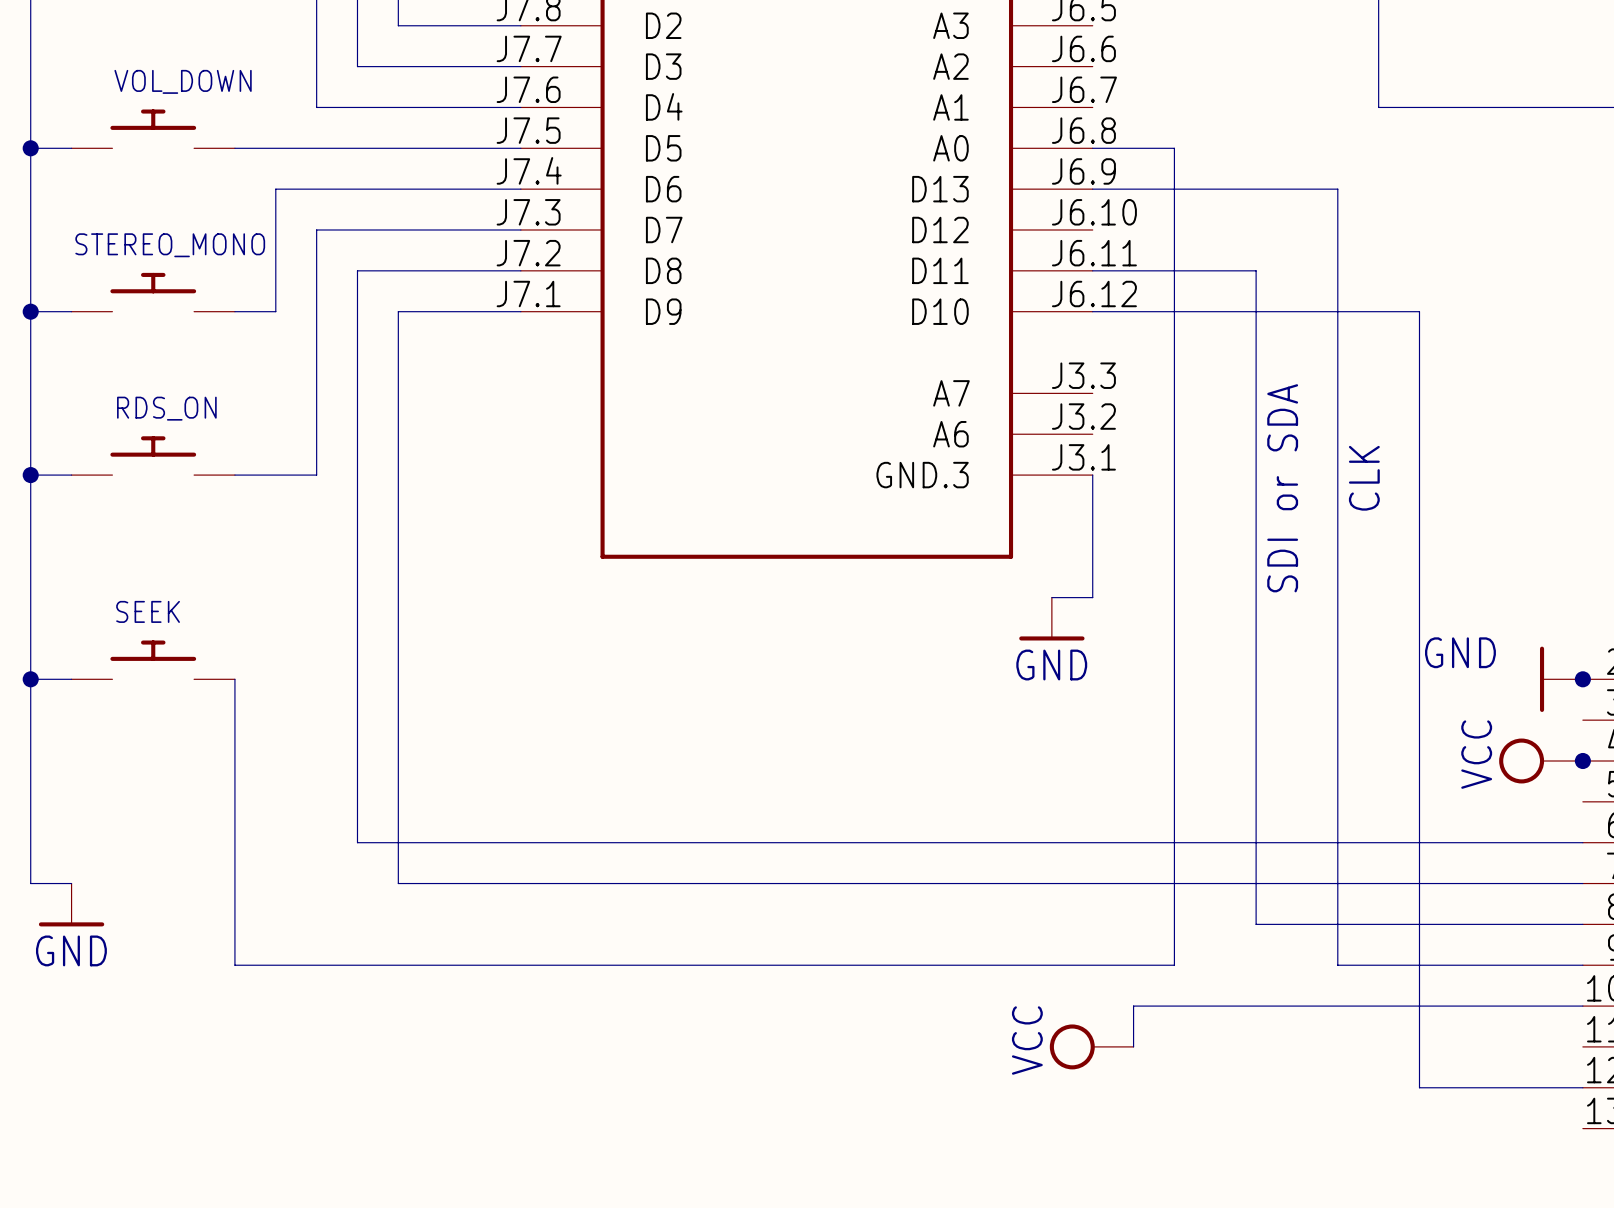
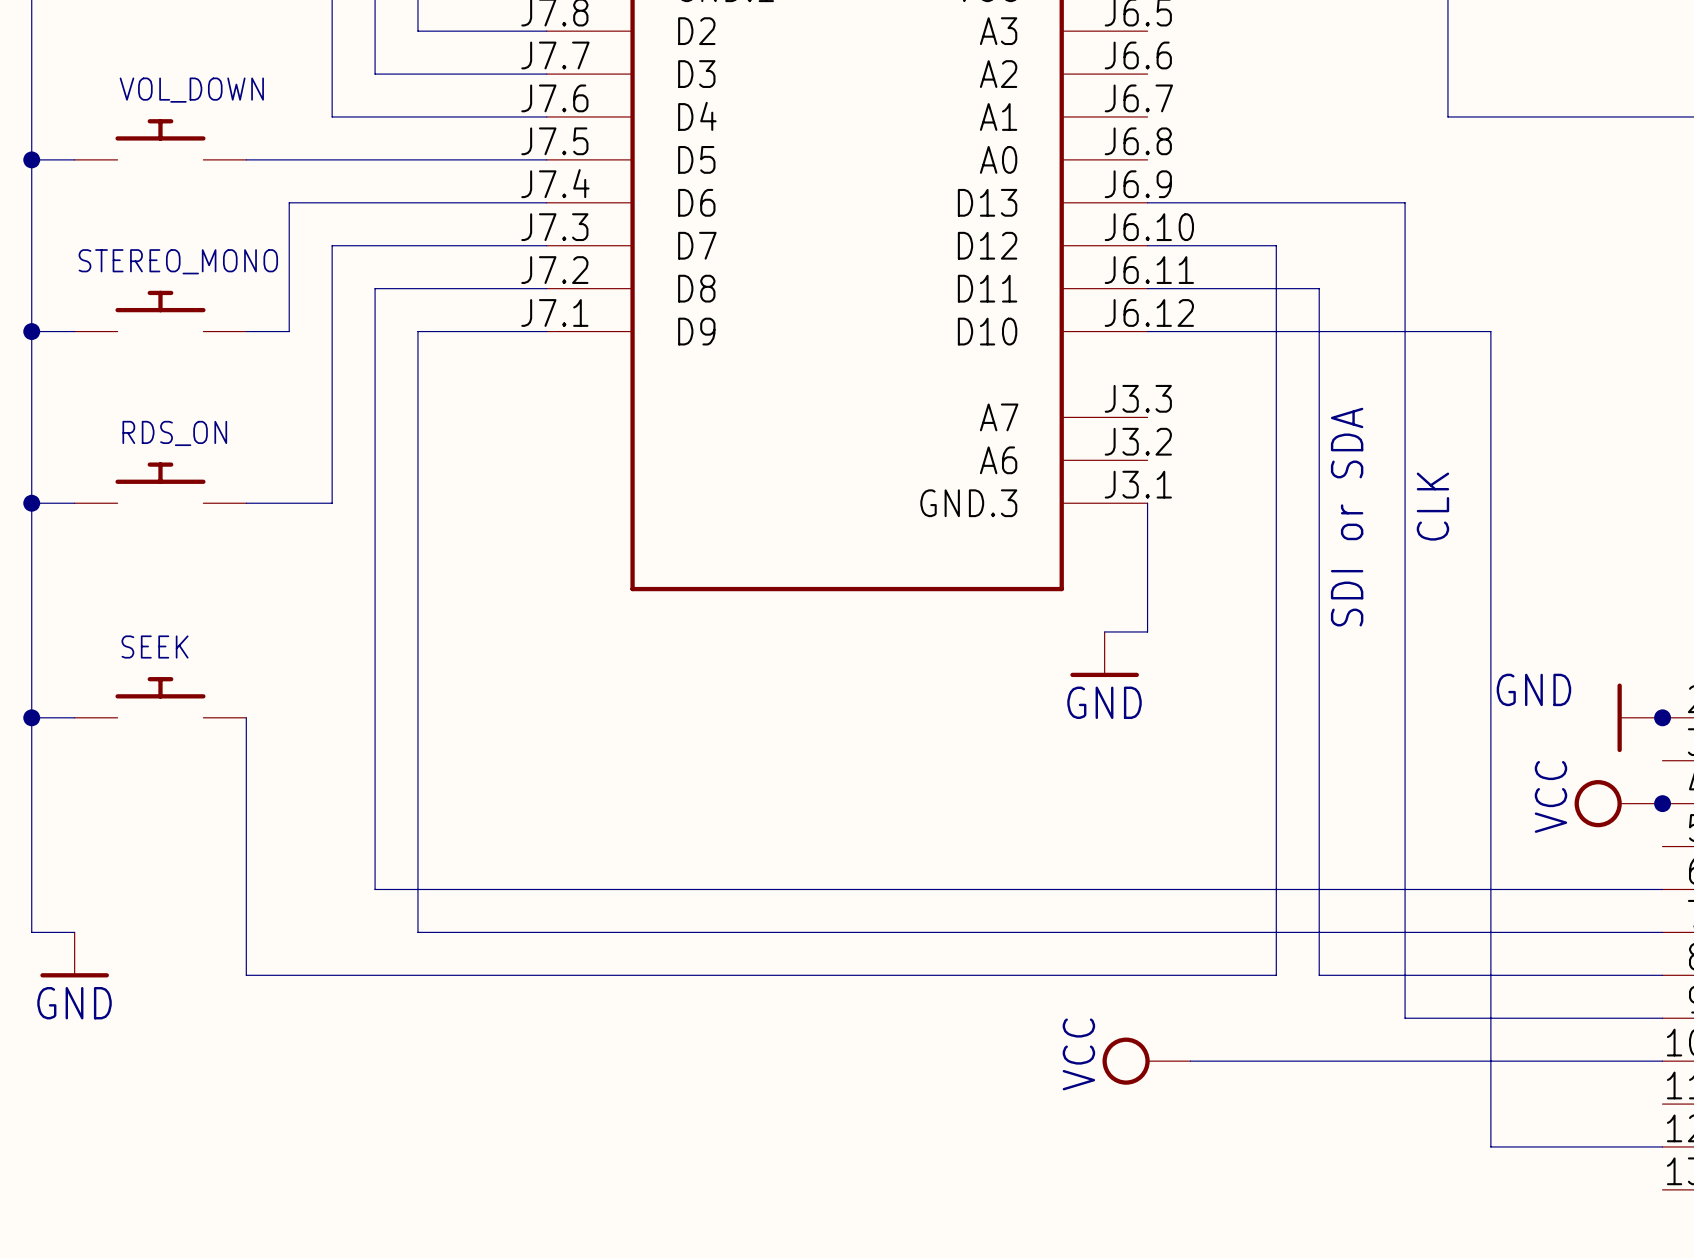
wire: (1092, 148) (1174, 148) (1174, 965) (234, 965) (234, 924) -> (1147, 245) (1276, 245) (1276, 975) (246, 975)
wire: (1133, 1006) (1133, 1046) -> none
power symbol position: VCC (1091, 1046) -> VCC (1146, 1061)

